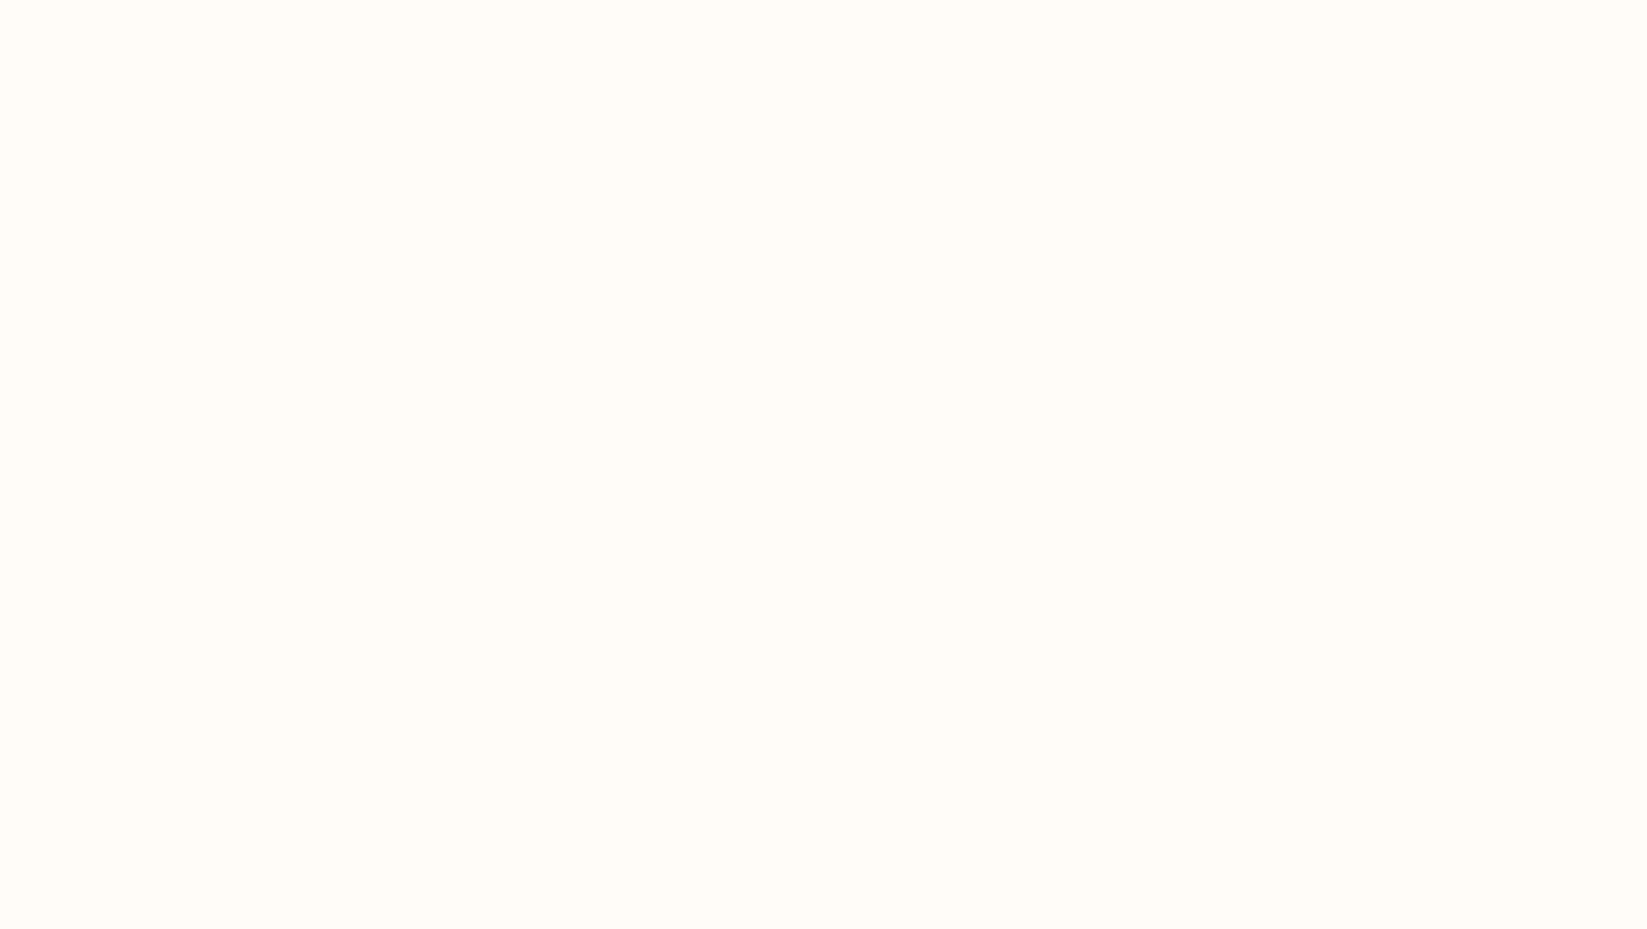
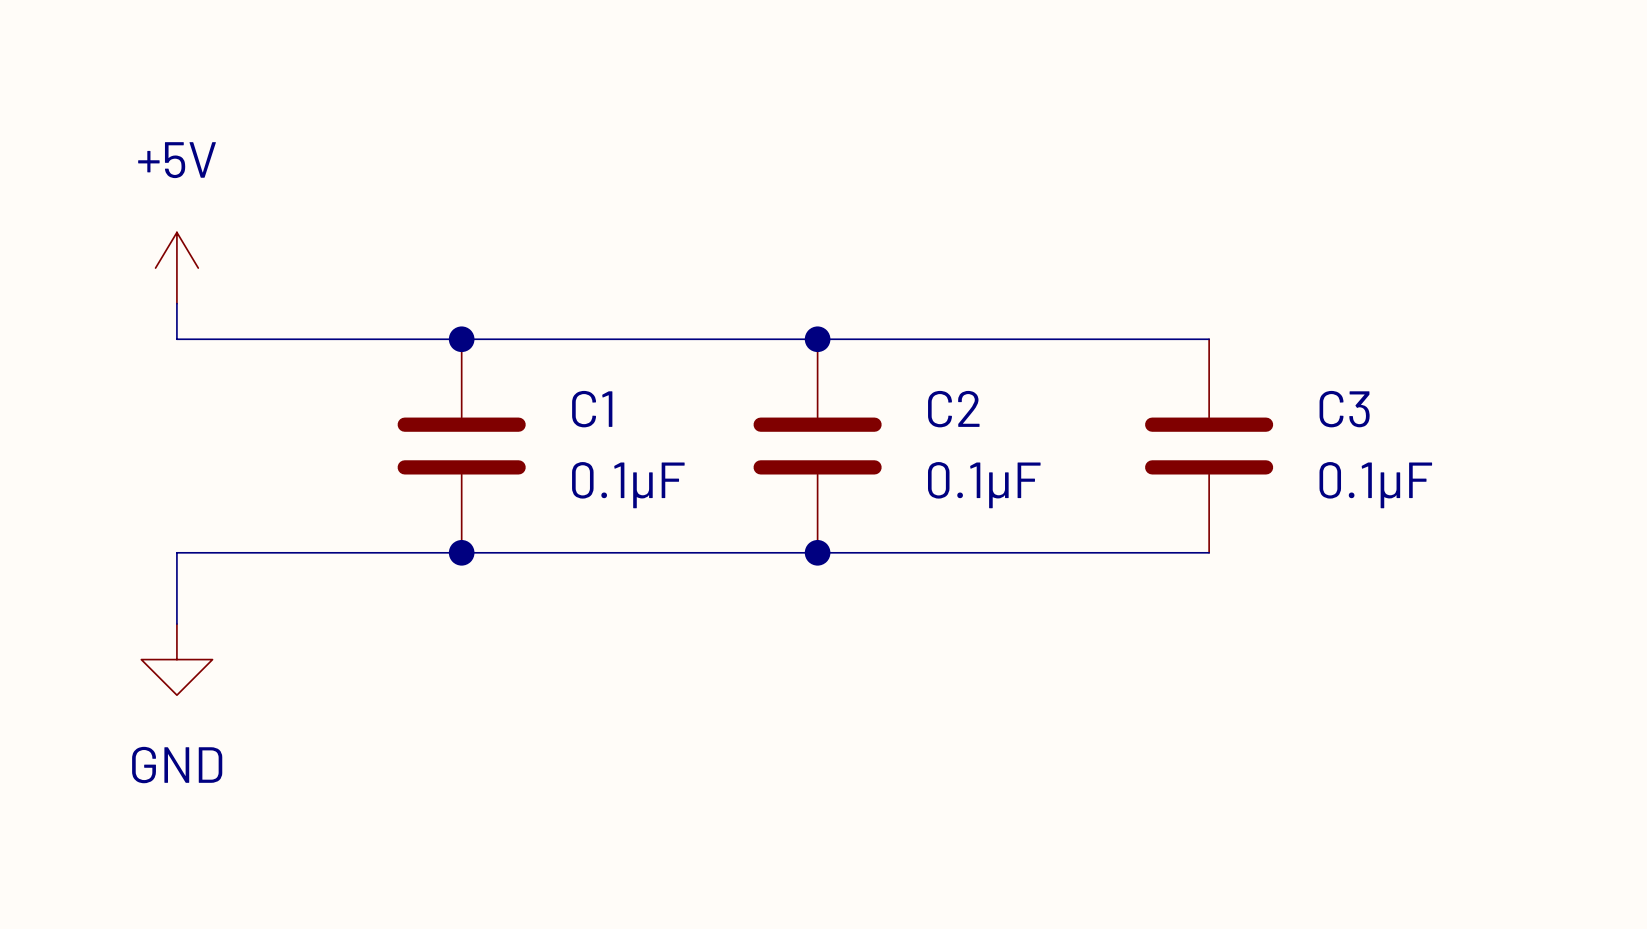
power symbol: none -> +5V (176, 268)
wire: none -> (176, 303) (176, 339) (1209, 339)
junction: none -> (461, 339)
junction: none -> (817, 339)
C1: none -> 0.1μF (461, 446)
C2: none -> 0.1μF (817, 446)
C3: none -> 0.1μF (1209, 446)
junction: none -> (461, 552)
junction: none -> (817, 552)
wire: none -> (1209, 552) (176, 552) (176, 623)
power symbol: none -> GND (176, 659)

